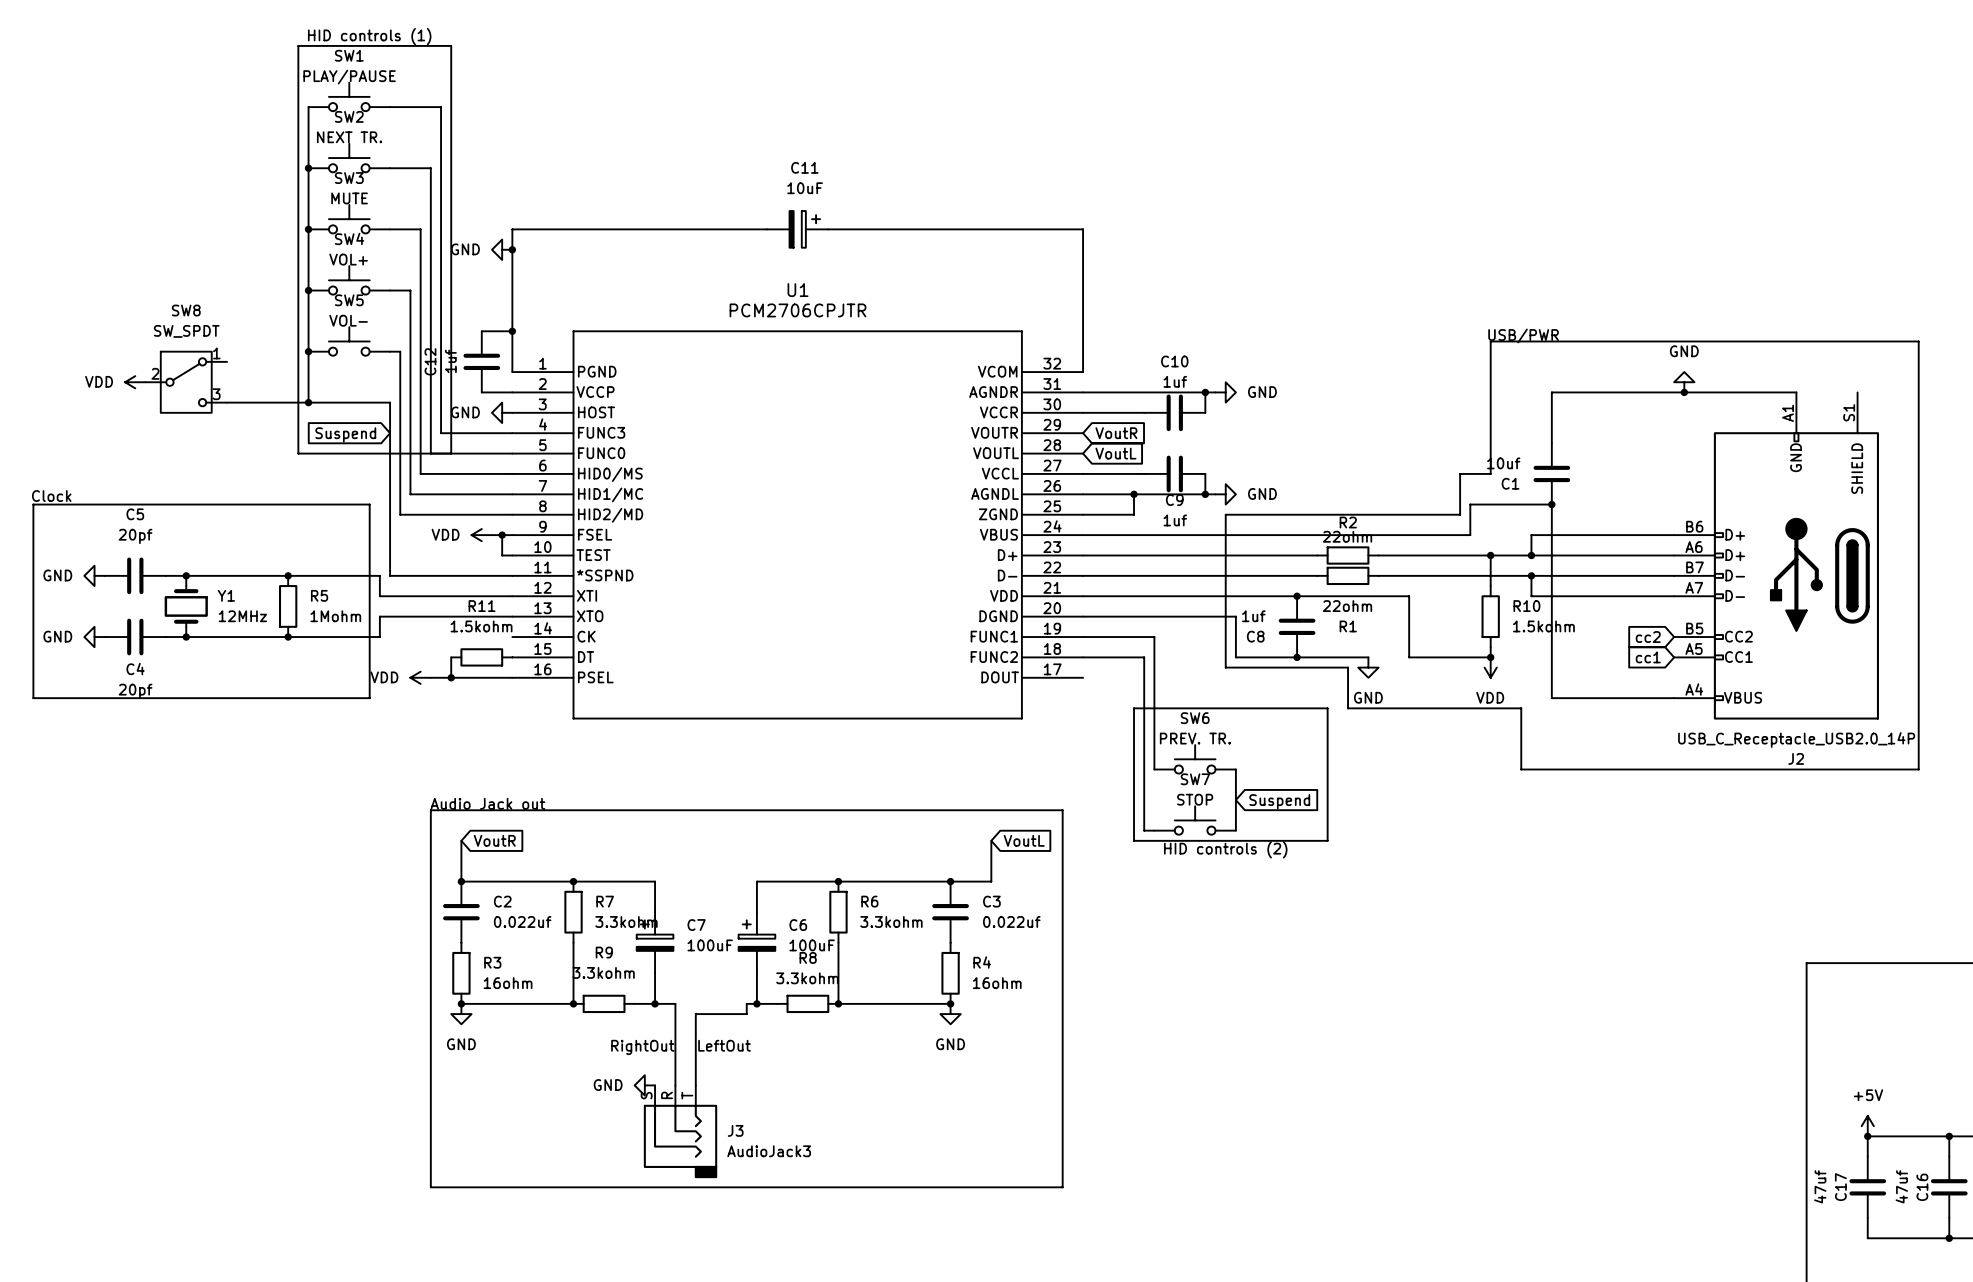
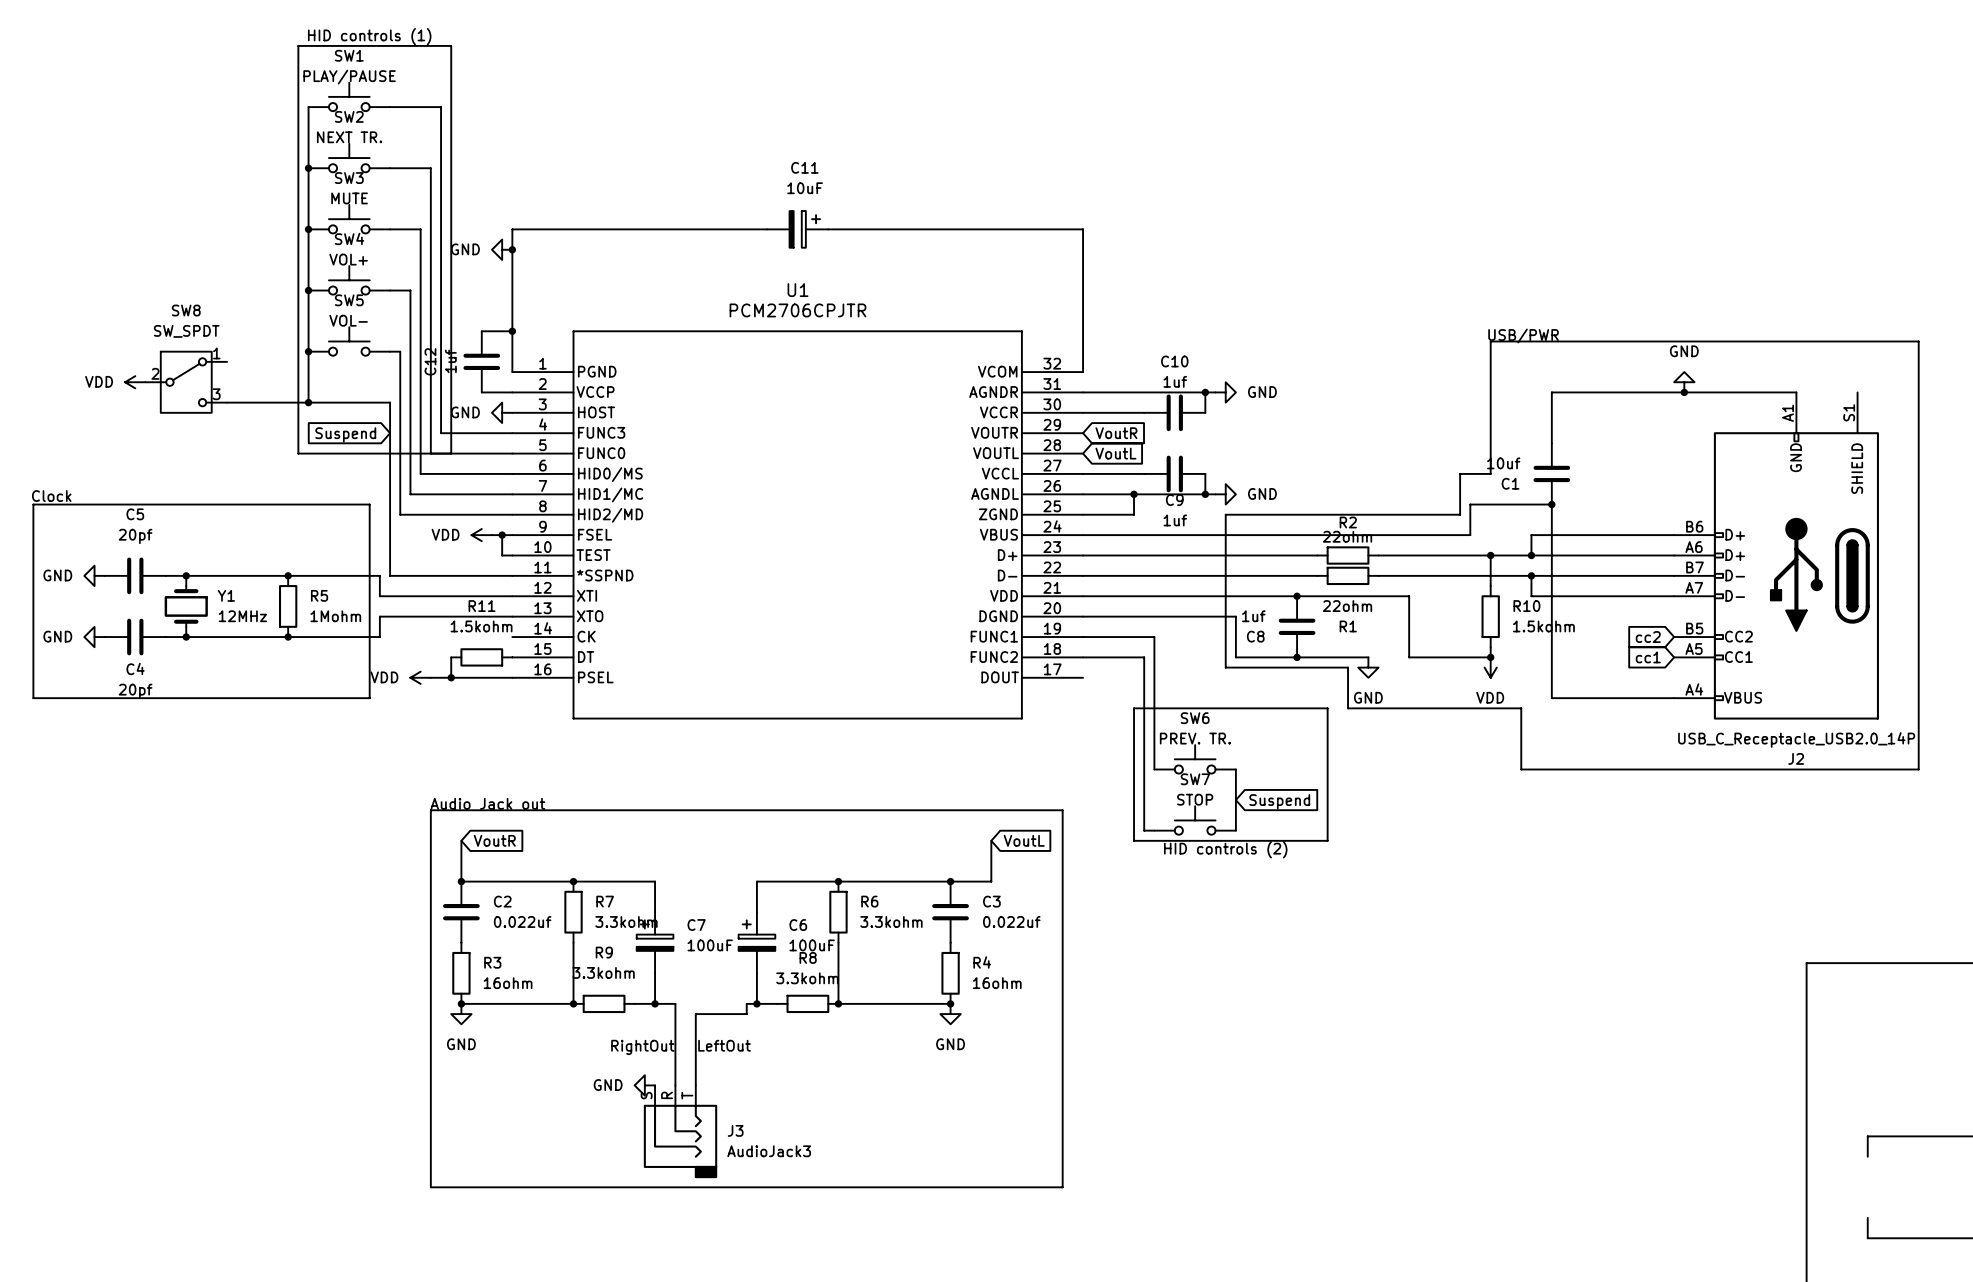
power symbol: +5V (1867, 1126) -> none
junction: (1867, 1136) -> none
wire: (1949, 1136) (1949, 1156) -> none
junction: (1949, 1136) -> none
C17: 47uf (1867, 1187) -> none
C16: 47uf (1949, 1187) -> none
wire: (1949, 1217) (1949, 1238) -> none
junction: (1949, 1238) -> none

